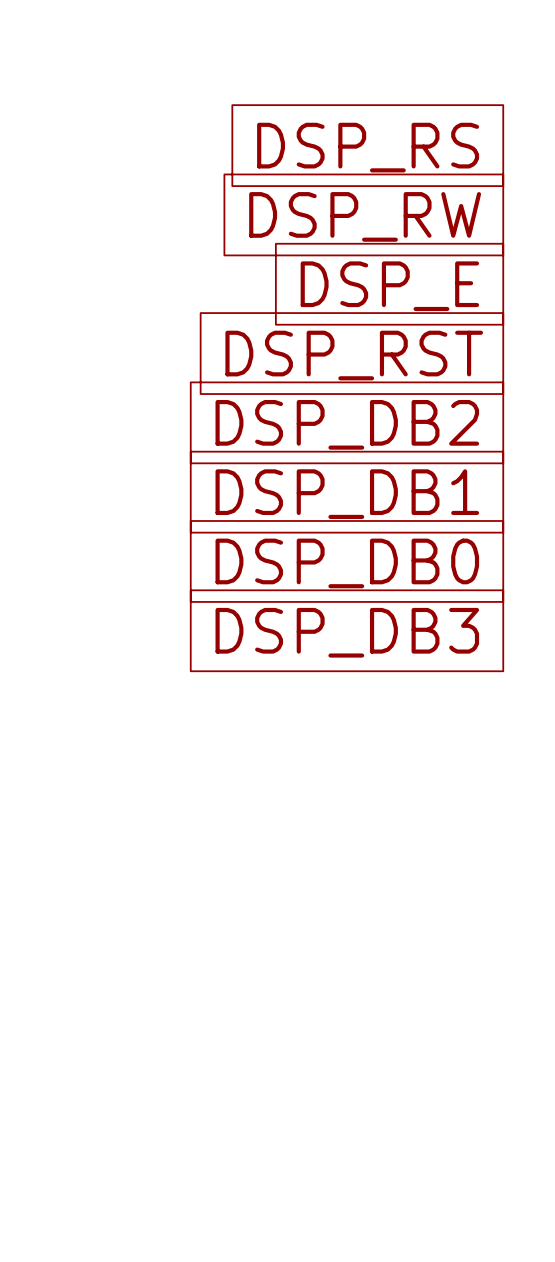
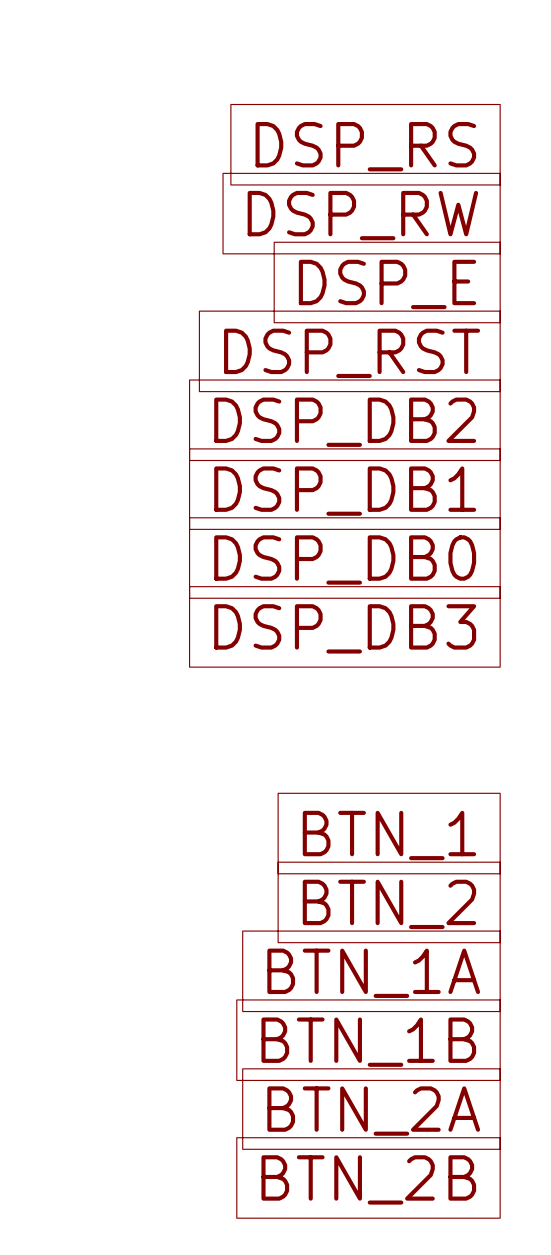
global label: none -> BTN_1 (389, 835)
global label: none -> BTN_2 (389, 904)
global label: none -> BTN_1A (373, 973)
global label: none -> BTN_1B (368, 1042)
global label: none -> BTN_2A (373, 1111)
global label: none -> BTN_2B (368, 1179)

